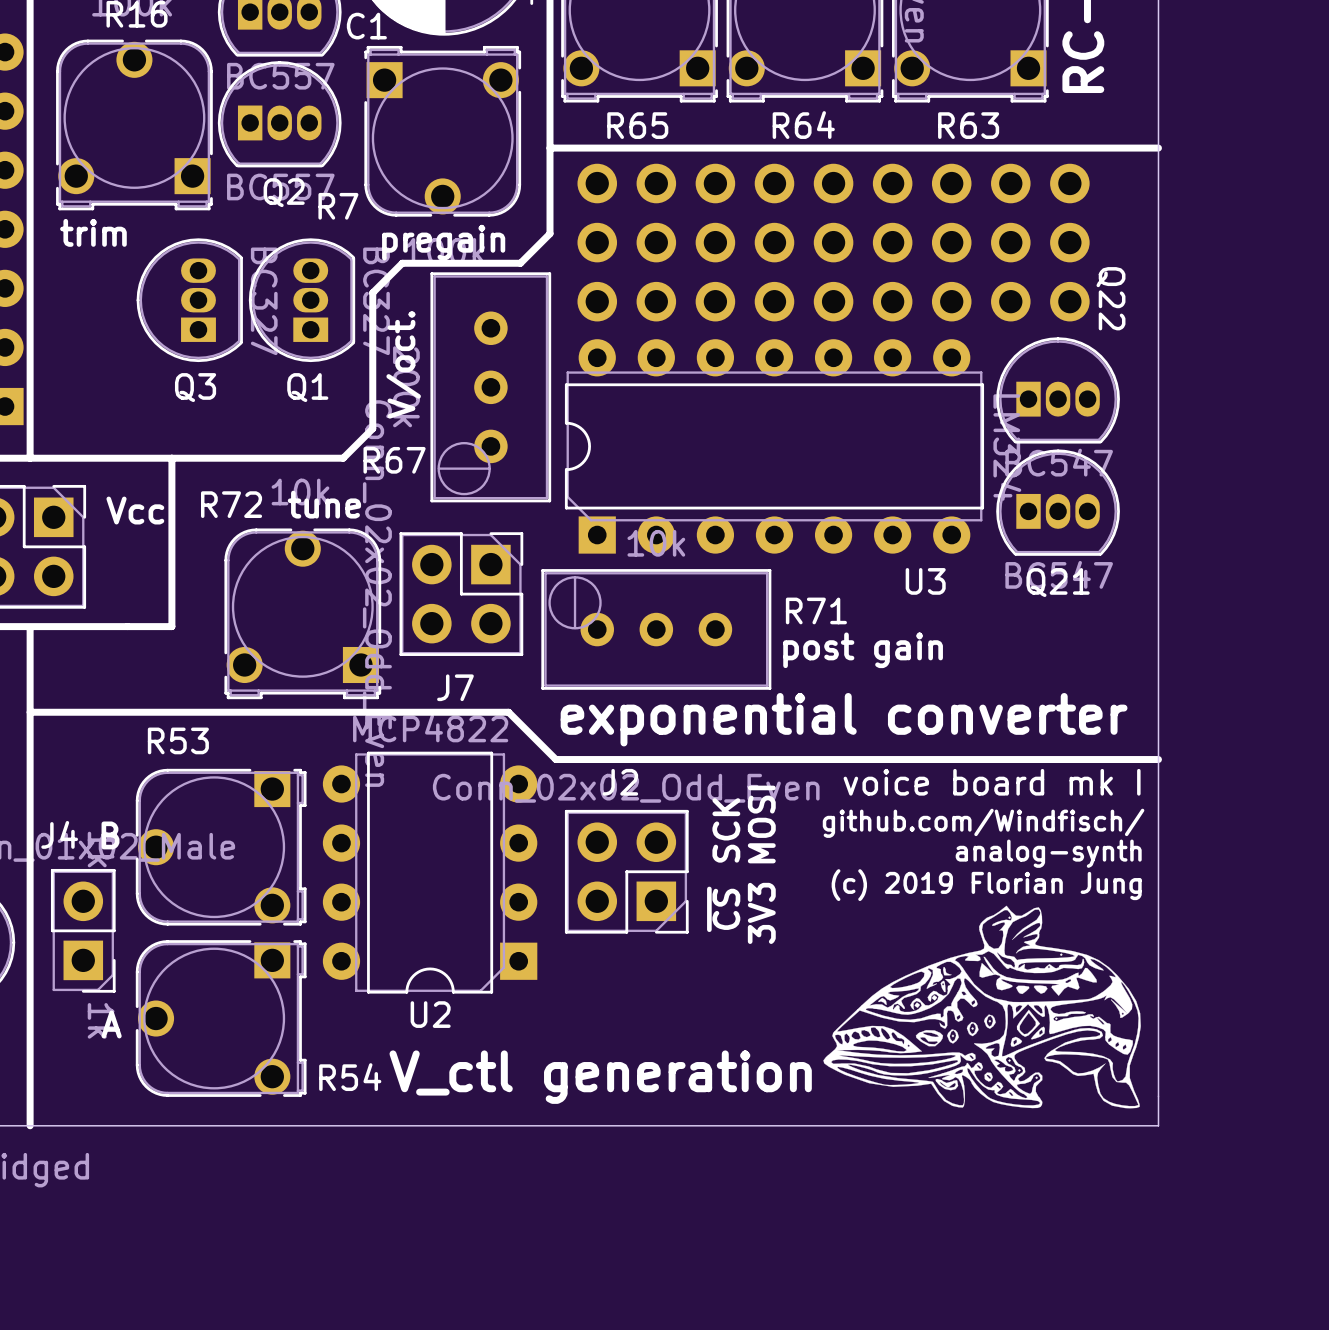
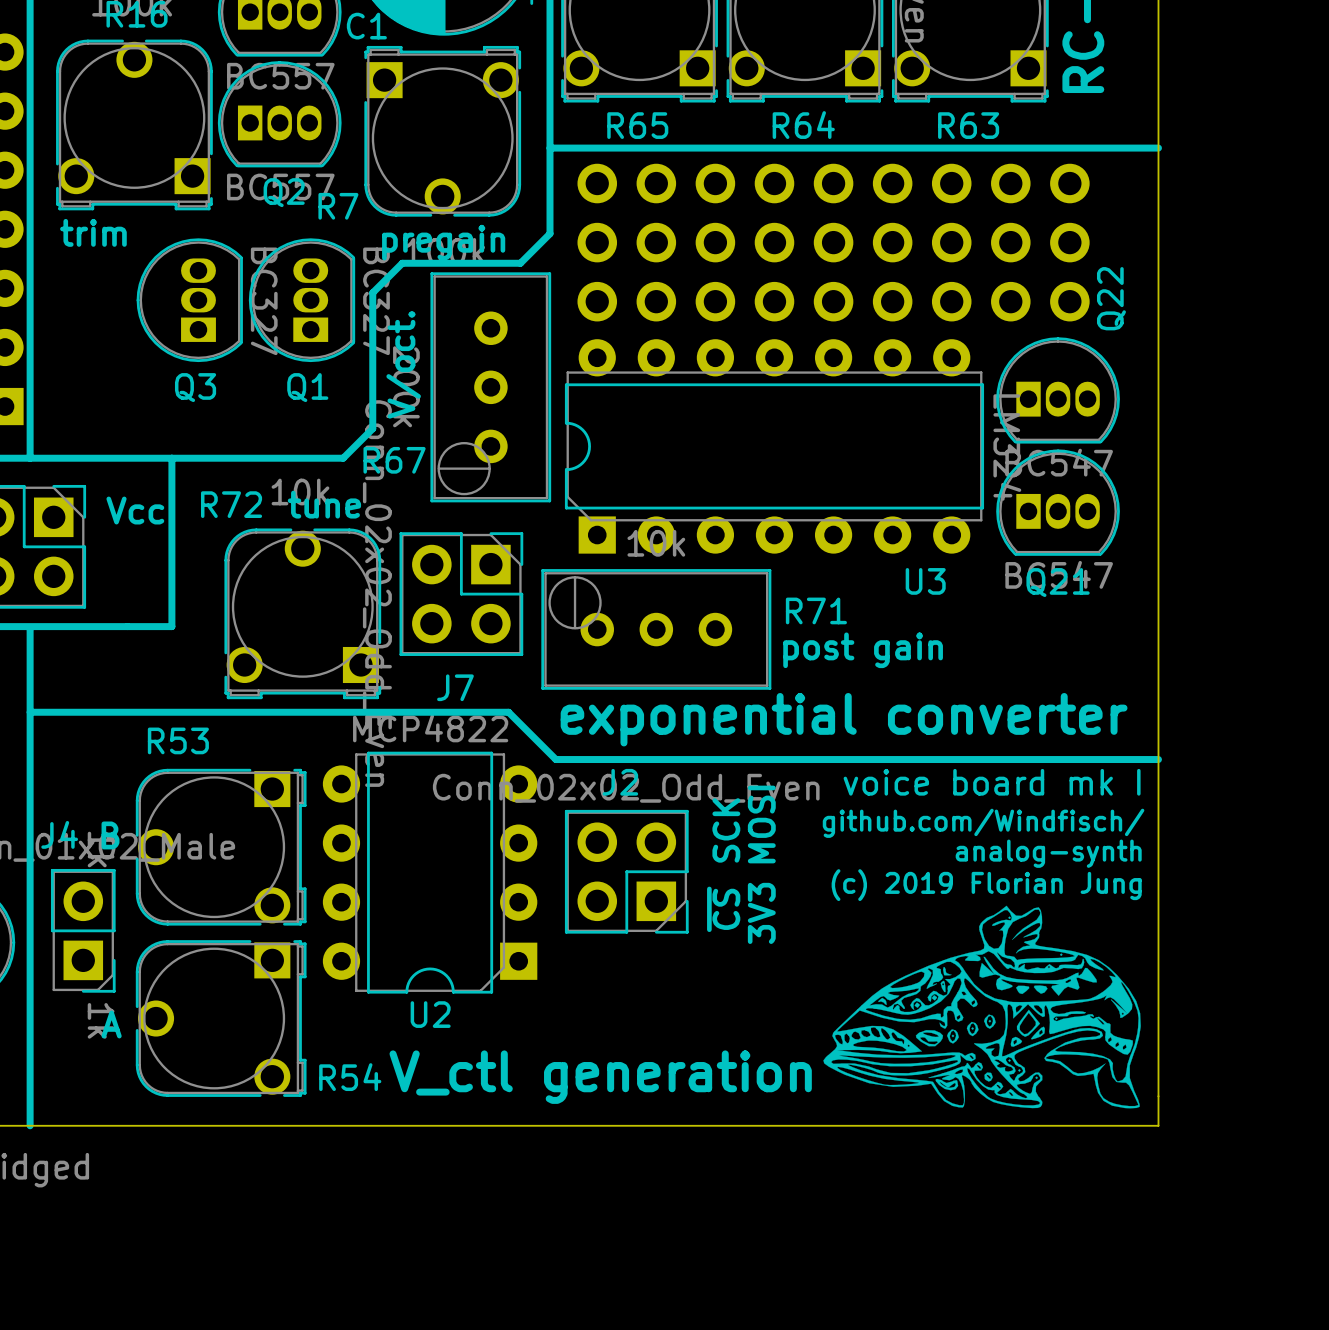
Q22 name rotation: 0° (1110, 298) -> 180° (1111, 298)

